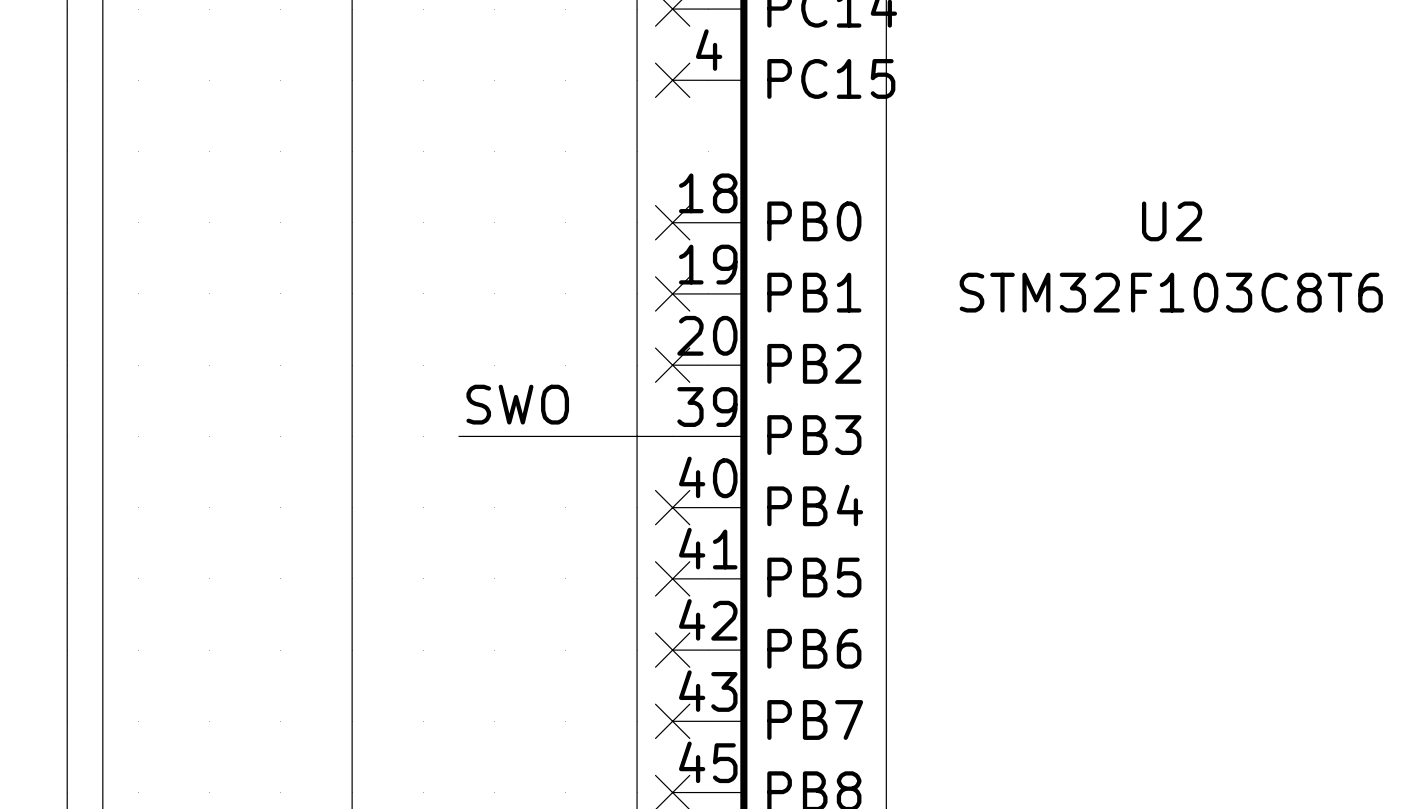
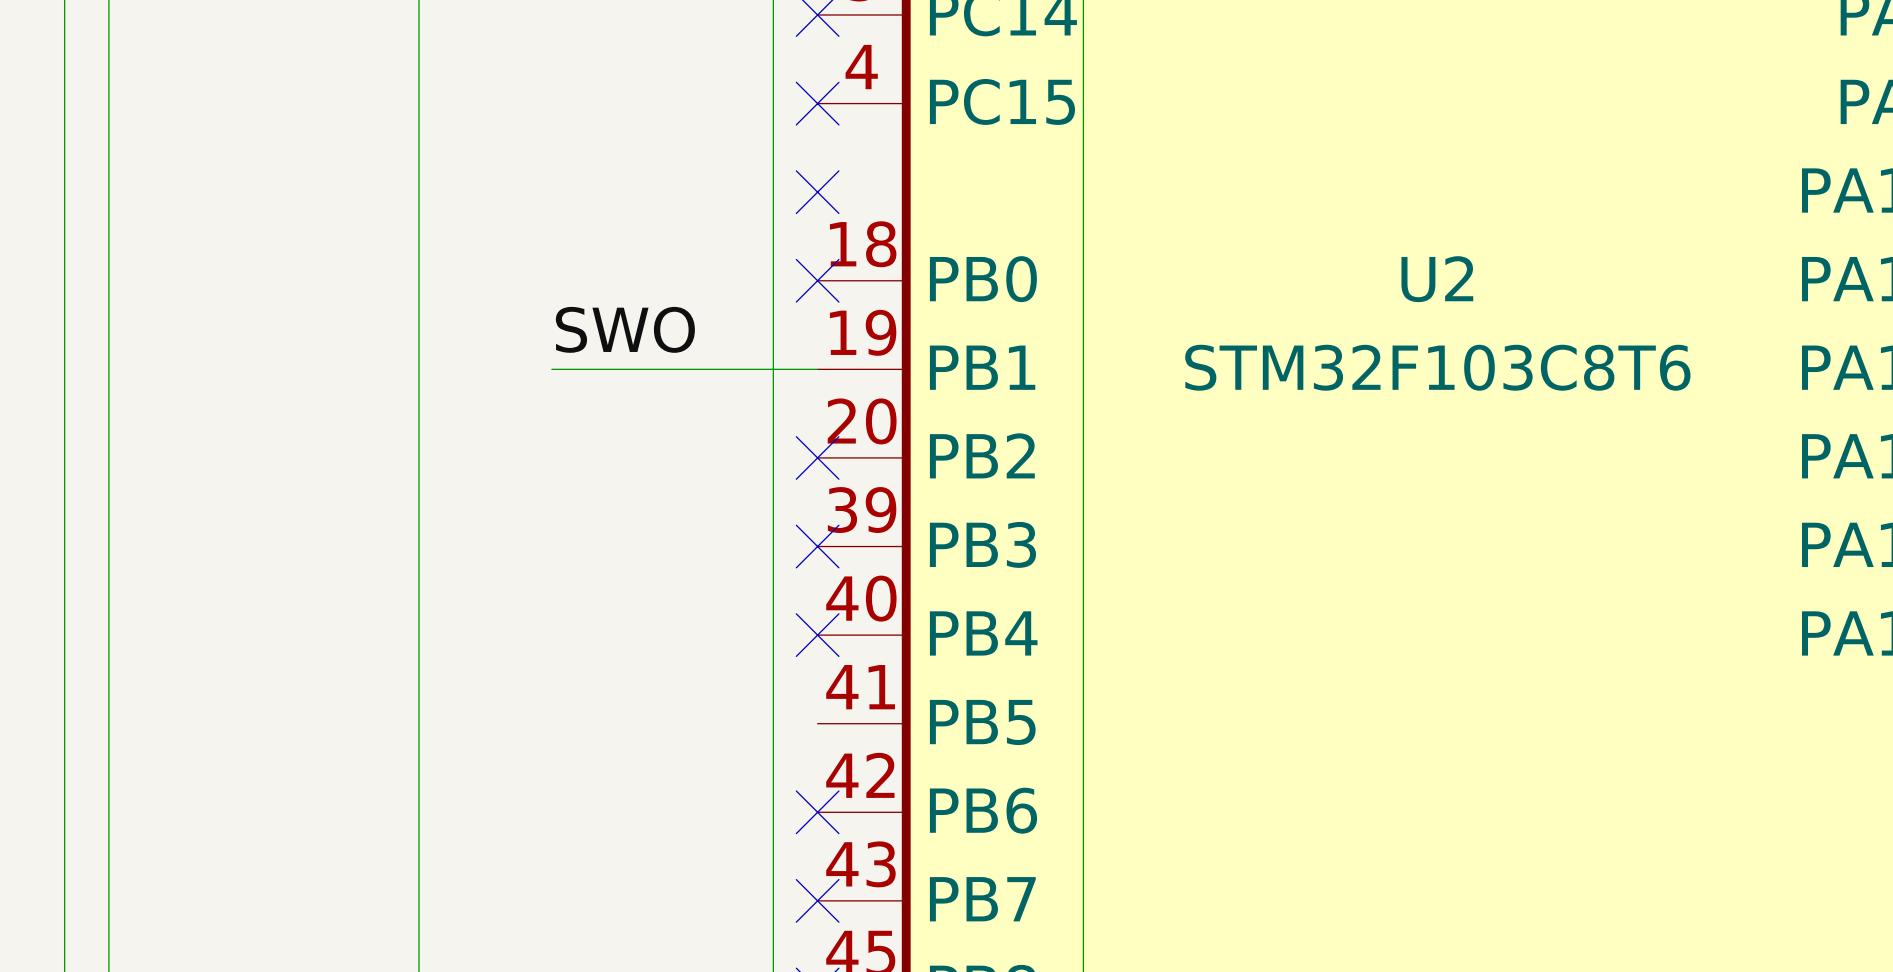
no-connect mark: none -> (817, 192)
no-connect mark: (672, 293) -> none
label position: SWO (517, 404) -> SWO (625, 329)
wire: (458, 436) (672, 436) -> (551, 369) (817, 369)
no-connect mark: none -> (817, 546)
no-connect mark: (672, 578) -> none

